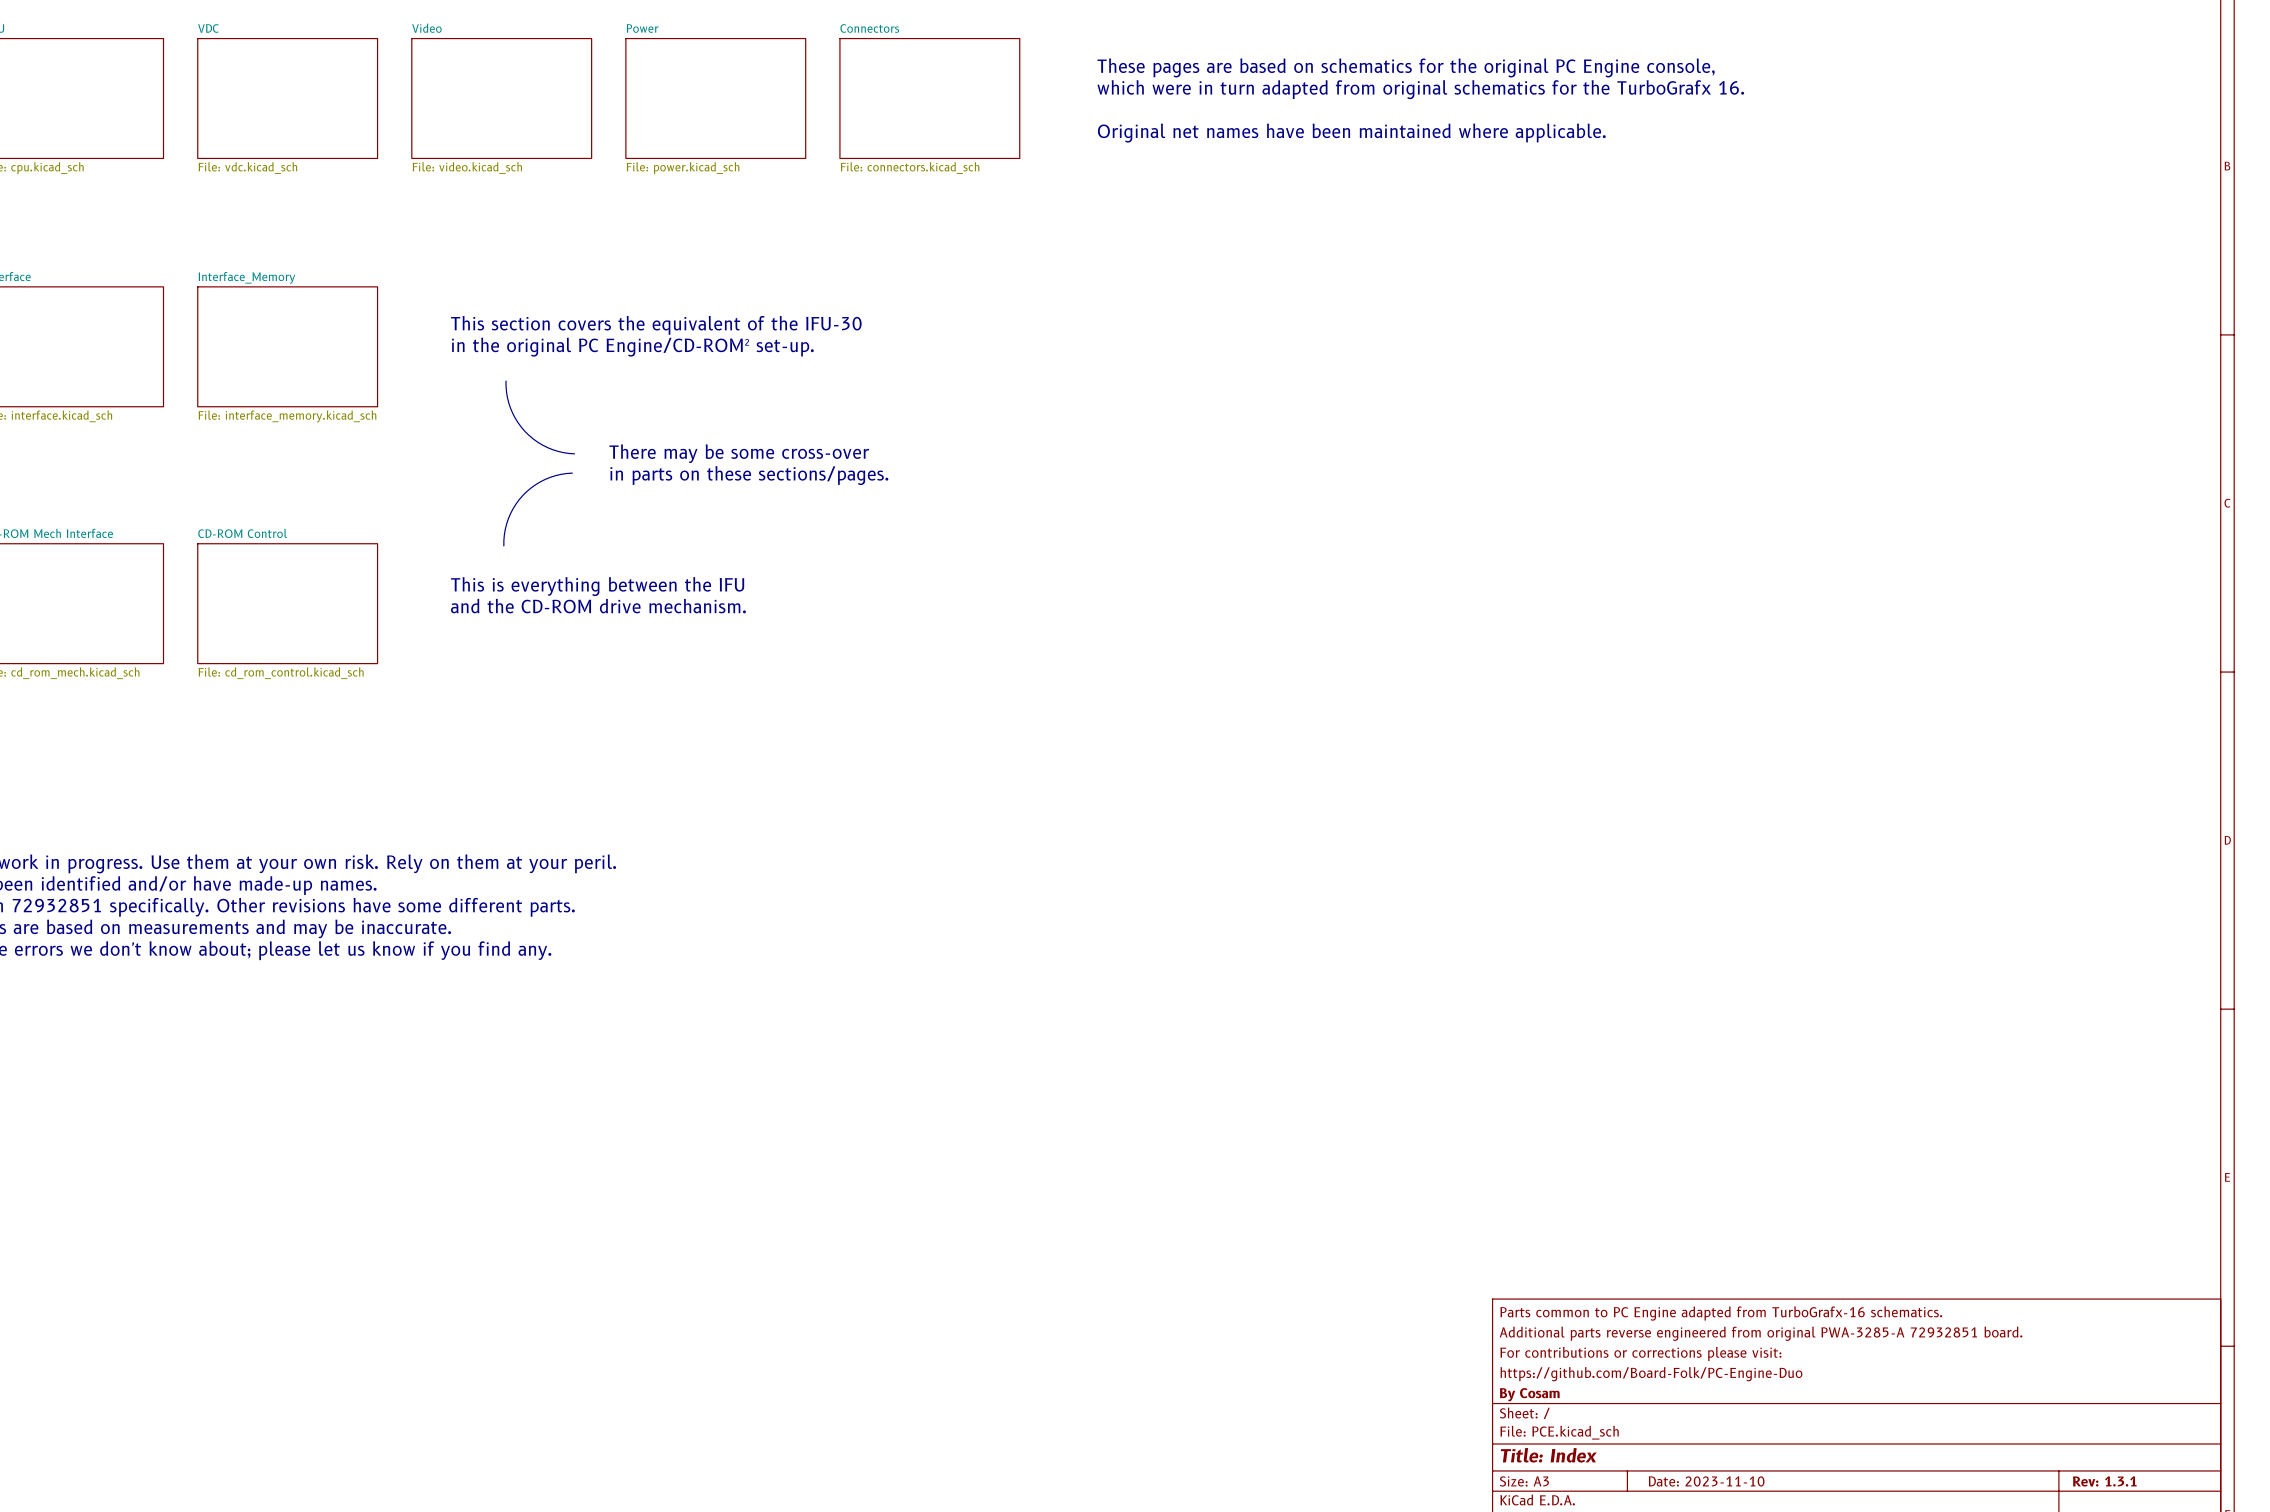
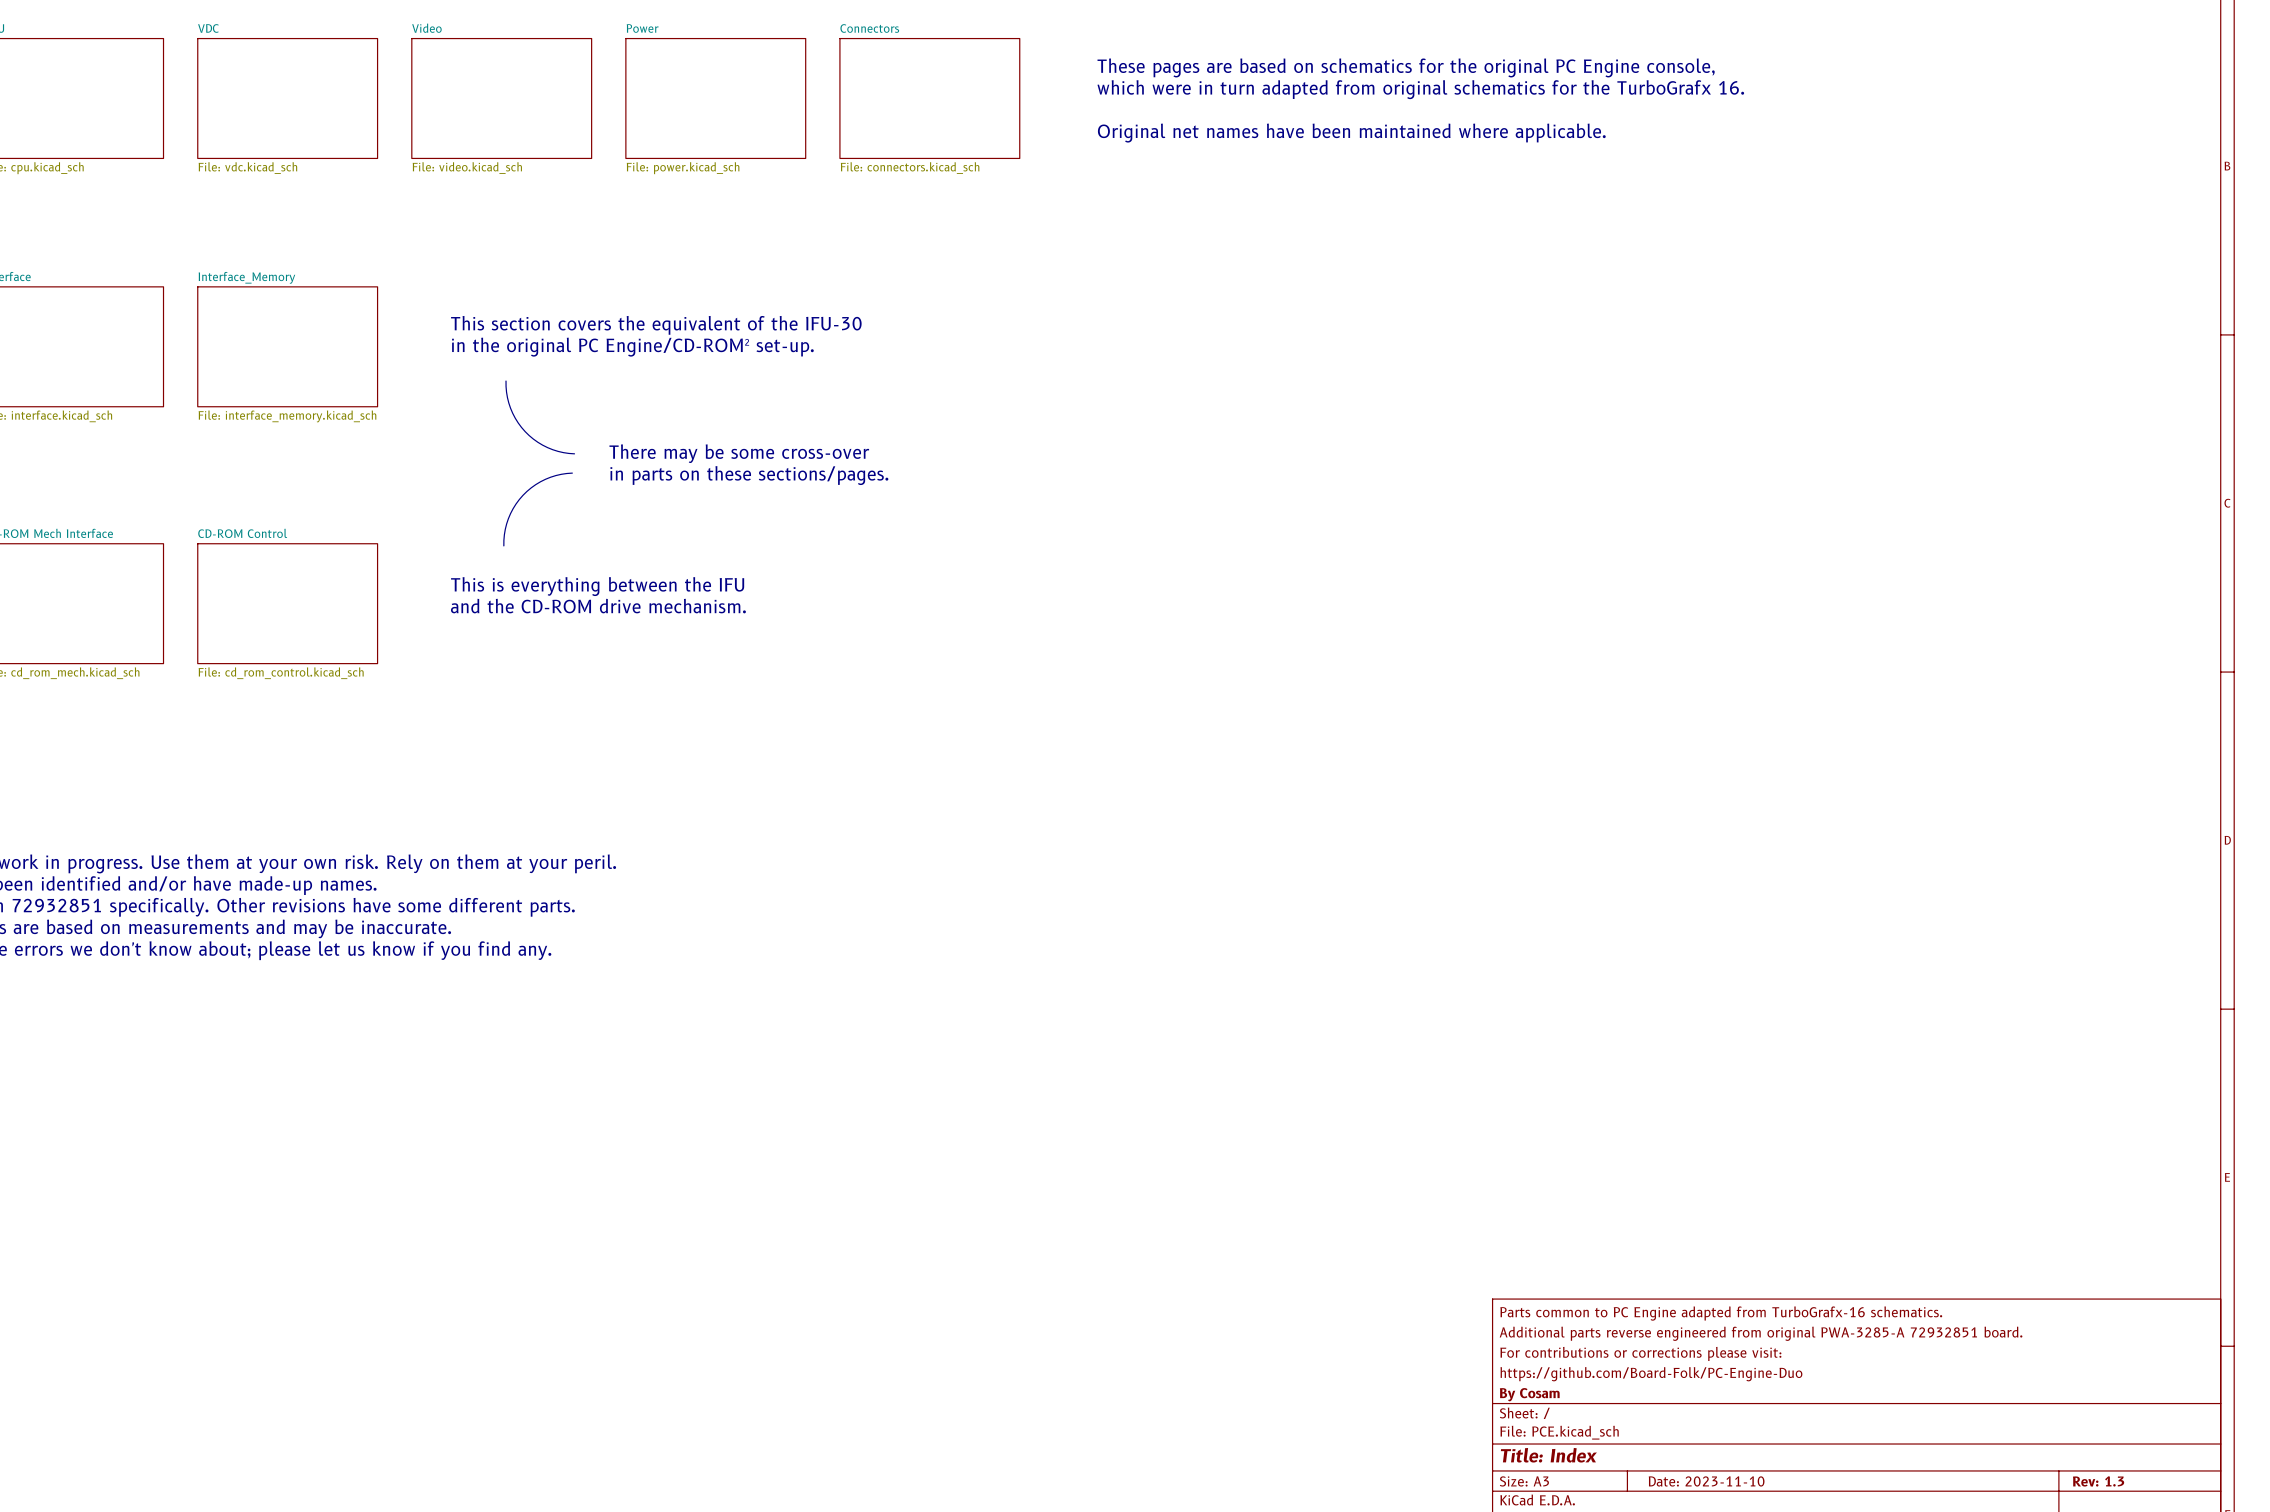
title block: Rev: 1.3.1 (2104, 1481) -> Rev: 1.3 (2098, 1481)

